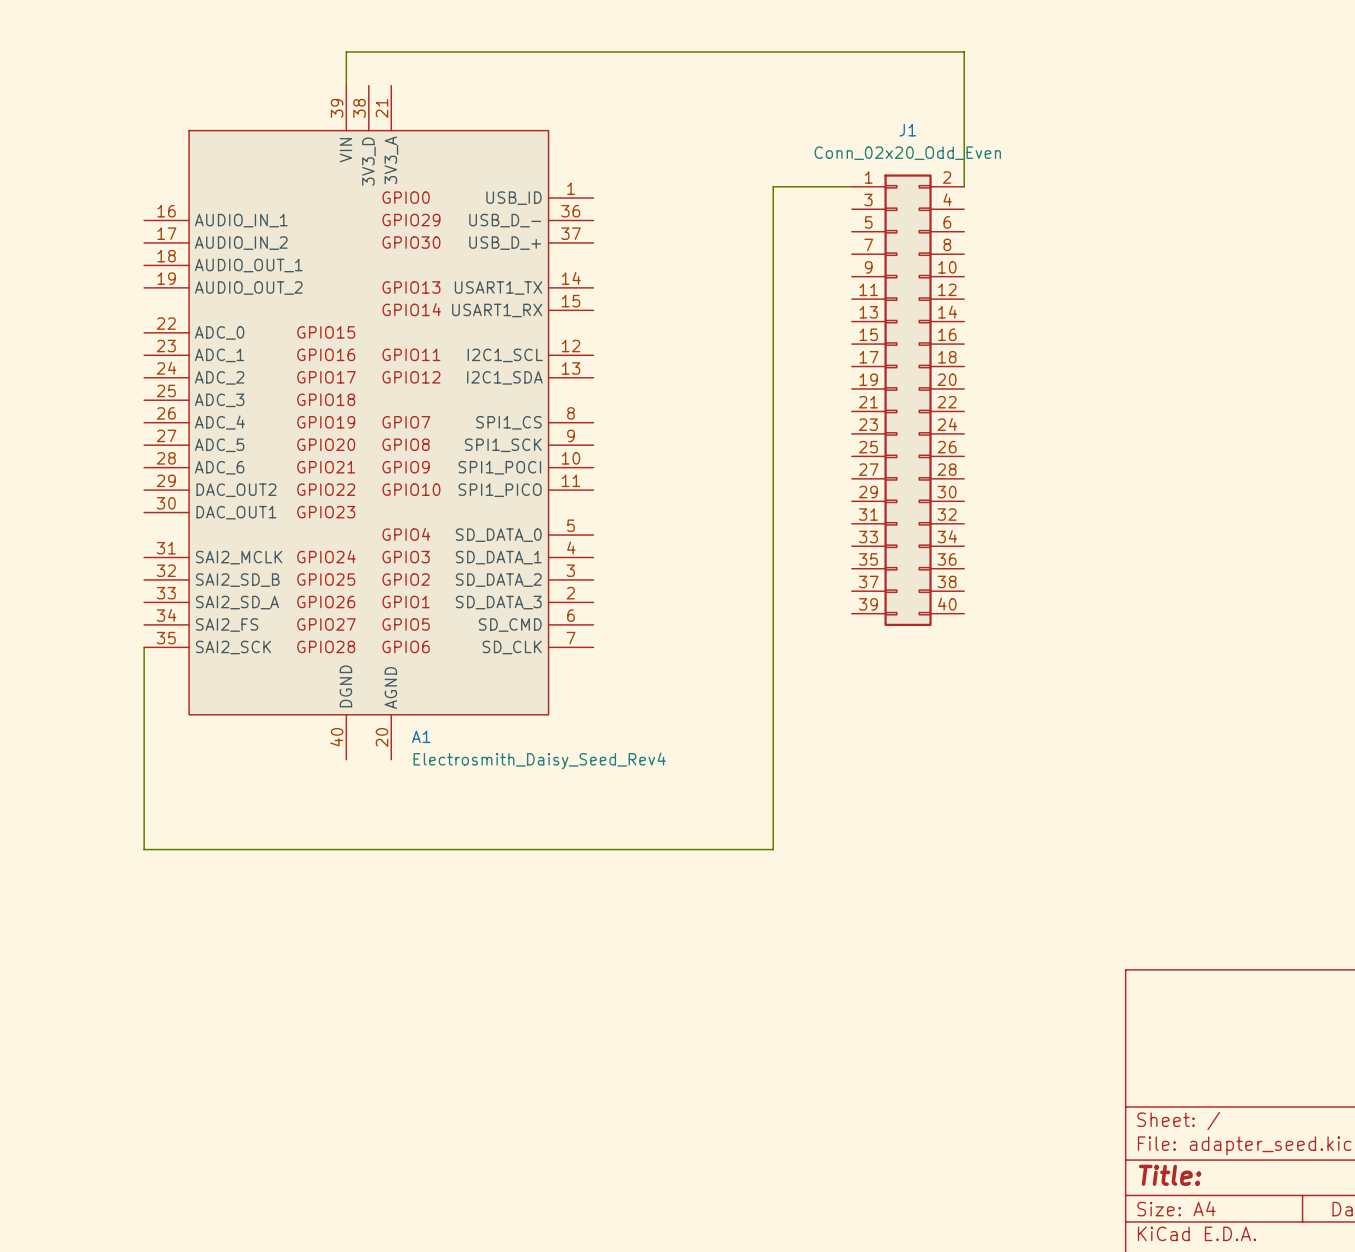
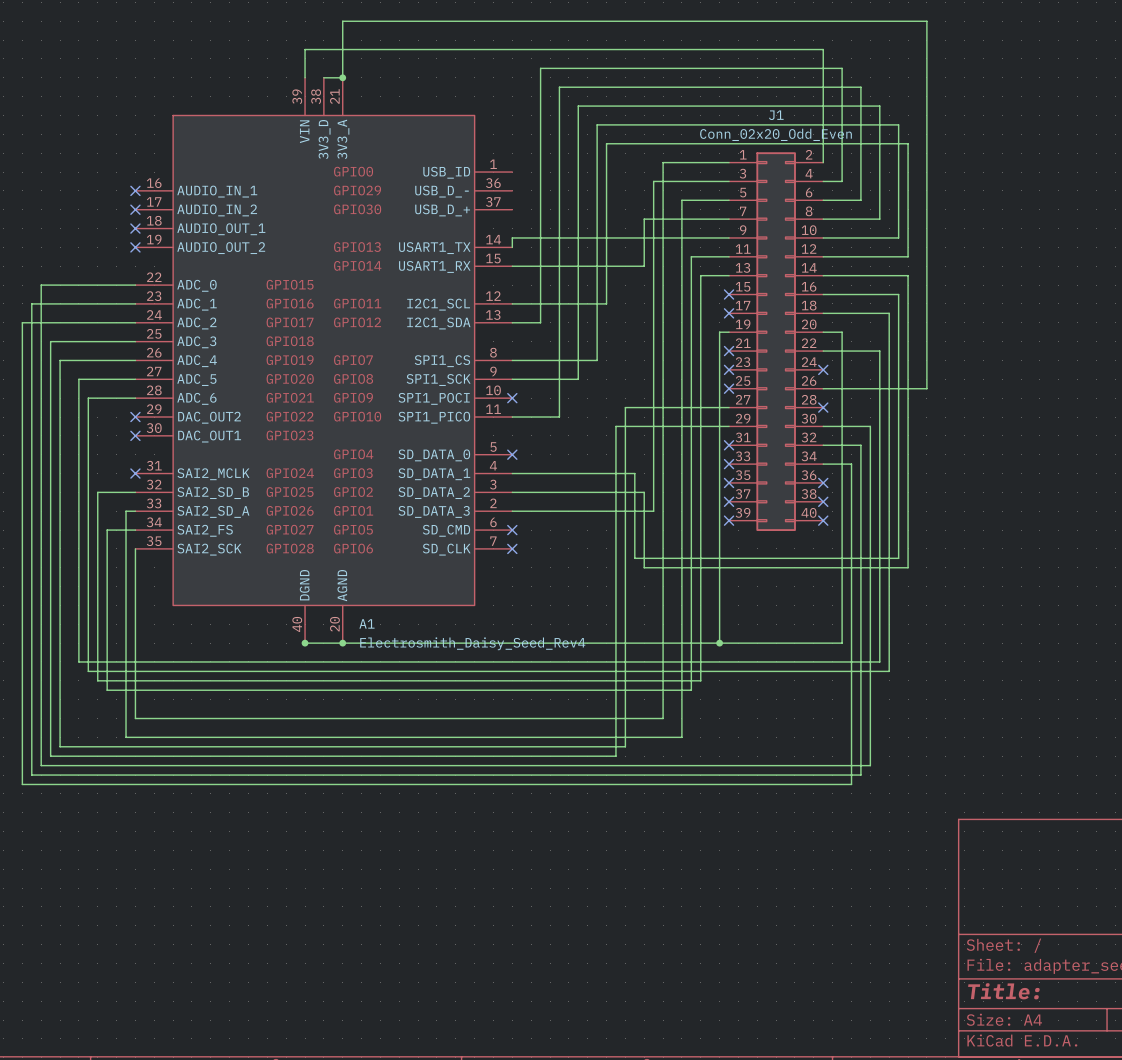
wire: none -> (323, 77) (342, 77) (342, 21) (926, 21) (926, 388) (823, 388)
junction: none -> (342, 77)
wire: none -> (729, 181) (653, 181) (653, 511) (512, 511)
wire: none -> (823, 181) (842, 181) (842, 68) (540, 68) (540, 322) (512, 322)
no-connect mark: none -> (135, 190)
wire: none -> (729, 200) (681, 200) (681, 737) (126, 737) (126, 511) (135, 511)
wire: none -> (823, 200) (860, 200) (860, 87) (559, 87) (559, 417) (512, 417)
no-connect mark: none -> (135, 209)
wire: none -> (729, 219) (644, 219) (644, 266) (512, 266)
wire: none -> (823, 219) (879, 219) (879, 106) (578, 106) (578, 379) (512, 379)
no-connect mark: none -> (135, 228)
wire: none -> (729, 237) (512, 237) (512, 247)
wire: none -> (823, 237) (898, 237) (898, 124) (597, 124) (597, 360) (512, 360)
no-connect mark: none -> (135, 247)
wire: none -> (729, 256) (691, 256) (691, 690) (107, 690) (107, 530) (135, 530)
wire: none -> (823, 256) (908, 256) (908, 143) (606, 143) (606, 303) (512, 303)
wire: none -> (729, 275) (700, 275) (700, 680) (97, 680) (97, 492) (135, 492)
wire: none -> (823, 275) (908, 275) (908, 567) (644, 567) (644, 492) (512, 492)
wire: none -> (135, 285) (41, 285) (41, 765) (870, 765) (870, 426) (823, 426)
no-connect mark: none -> (729, 294)
wire: none -> (823, 294) (898, 294) (898, 558) (634, 558) (634, 473) (512, 473)
wire: none -> (135, 303) (31, 303) (31, 775) (860, 775) (860, 445) (823, 445)
no-connect mark: none -> (729, 313)
wire: none -> (823, 313) (889, 313) (889, 671) (88, 671) (88, 398) (135, 398)
wire: none -> (135, 322) (22, 322) (22, 784) (851, 784) (851, 464) (823, 464)
wire: none -> (729, 332) (719, 332) (719, 643)
wire: none -> (823, 332) (842, 332) (842, 643) (305, 643)
wire: none -> (135, 341) (50, 341) (50, 756) (615, 756) (615, 426) (729, 426)
no-connect mark: none -> (729, 351)
wire: none -> (823, 351) (879, 351) (879, 661) (78, 661) (78, 379) (135, 379)
wire: none -> (135, 360) (60, 360) (60, 746) (625, 746) (625, 407) (729, 407)
no-connect mark: none -> (729, 369)
no-connect mark: none -> (823, 369)
no-connect mark: none -> (729, 388)
no-connect mark: none -> (512, 398)
no-connect mark: none -> (823, 407)
no-connect mark: none -> (135, 417)
no-connect mark: none -> (135, 435)
no-connect mark: none -> (729, 445)
no-connect mark: none -> (512, 454)
no-connect mark: none -> (729, 464)
no-connect mark: none -> (135, 473)
no-connect mark: none -> (729, 482)
no-connect mark: none -> (823, 482)
no-connect mark: none -> (729, 501)
no-connect mark: none -> (823, 501)
no-connect mark: none -> (729, 520)
no-connect mark: none -> (823, 520)
no-connect mark: none -> (512, 530)
no-connect mark: none -> (512, 548)
junction: none -> (305, 643)
junction: none -> (342, 643)
junction: none -> (719, 643)

